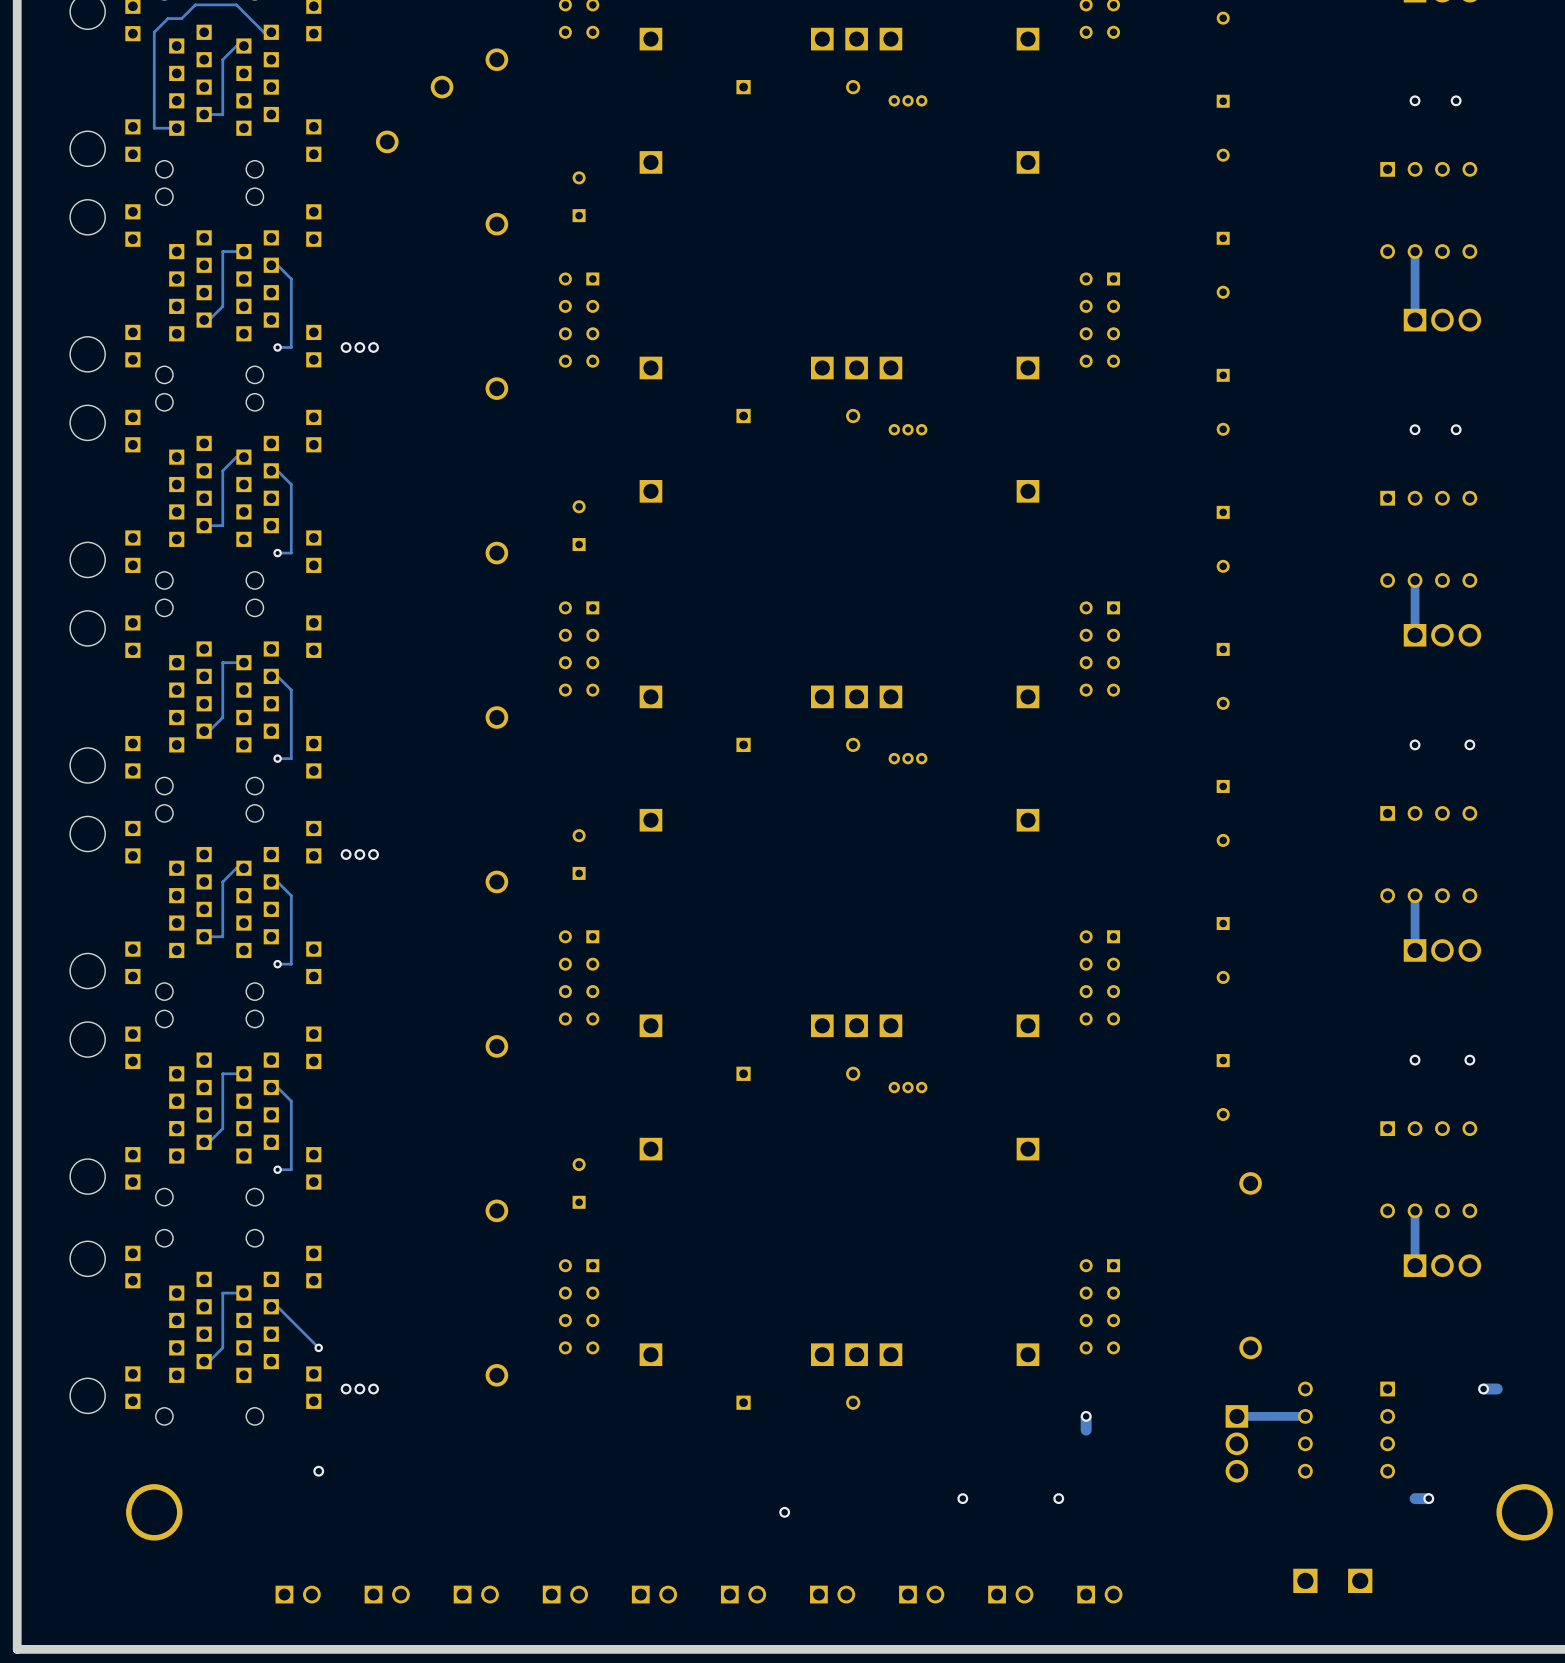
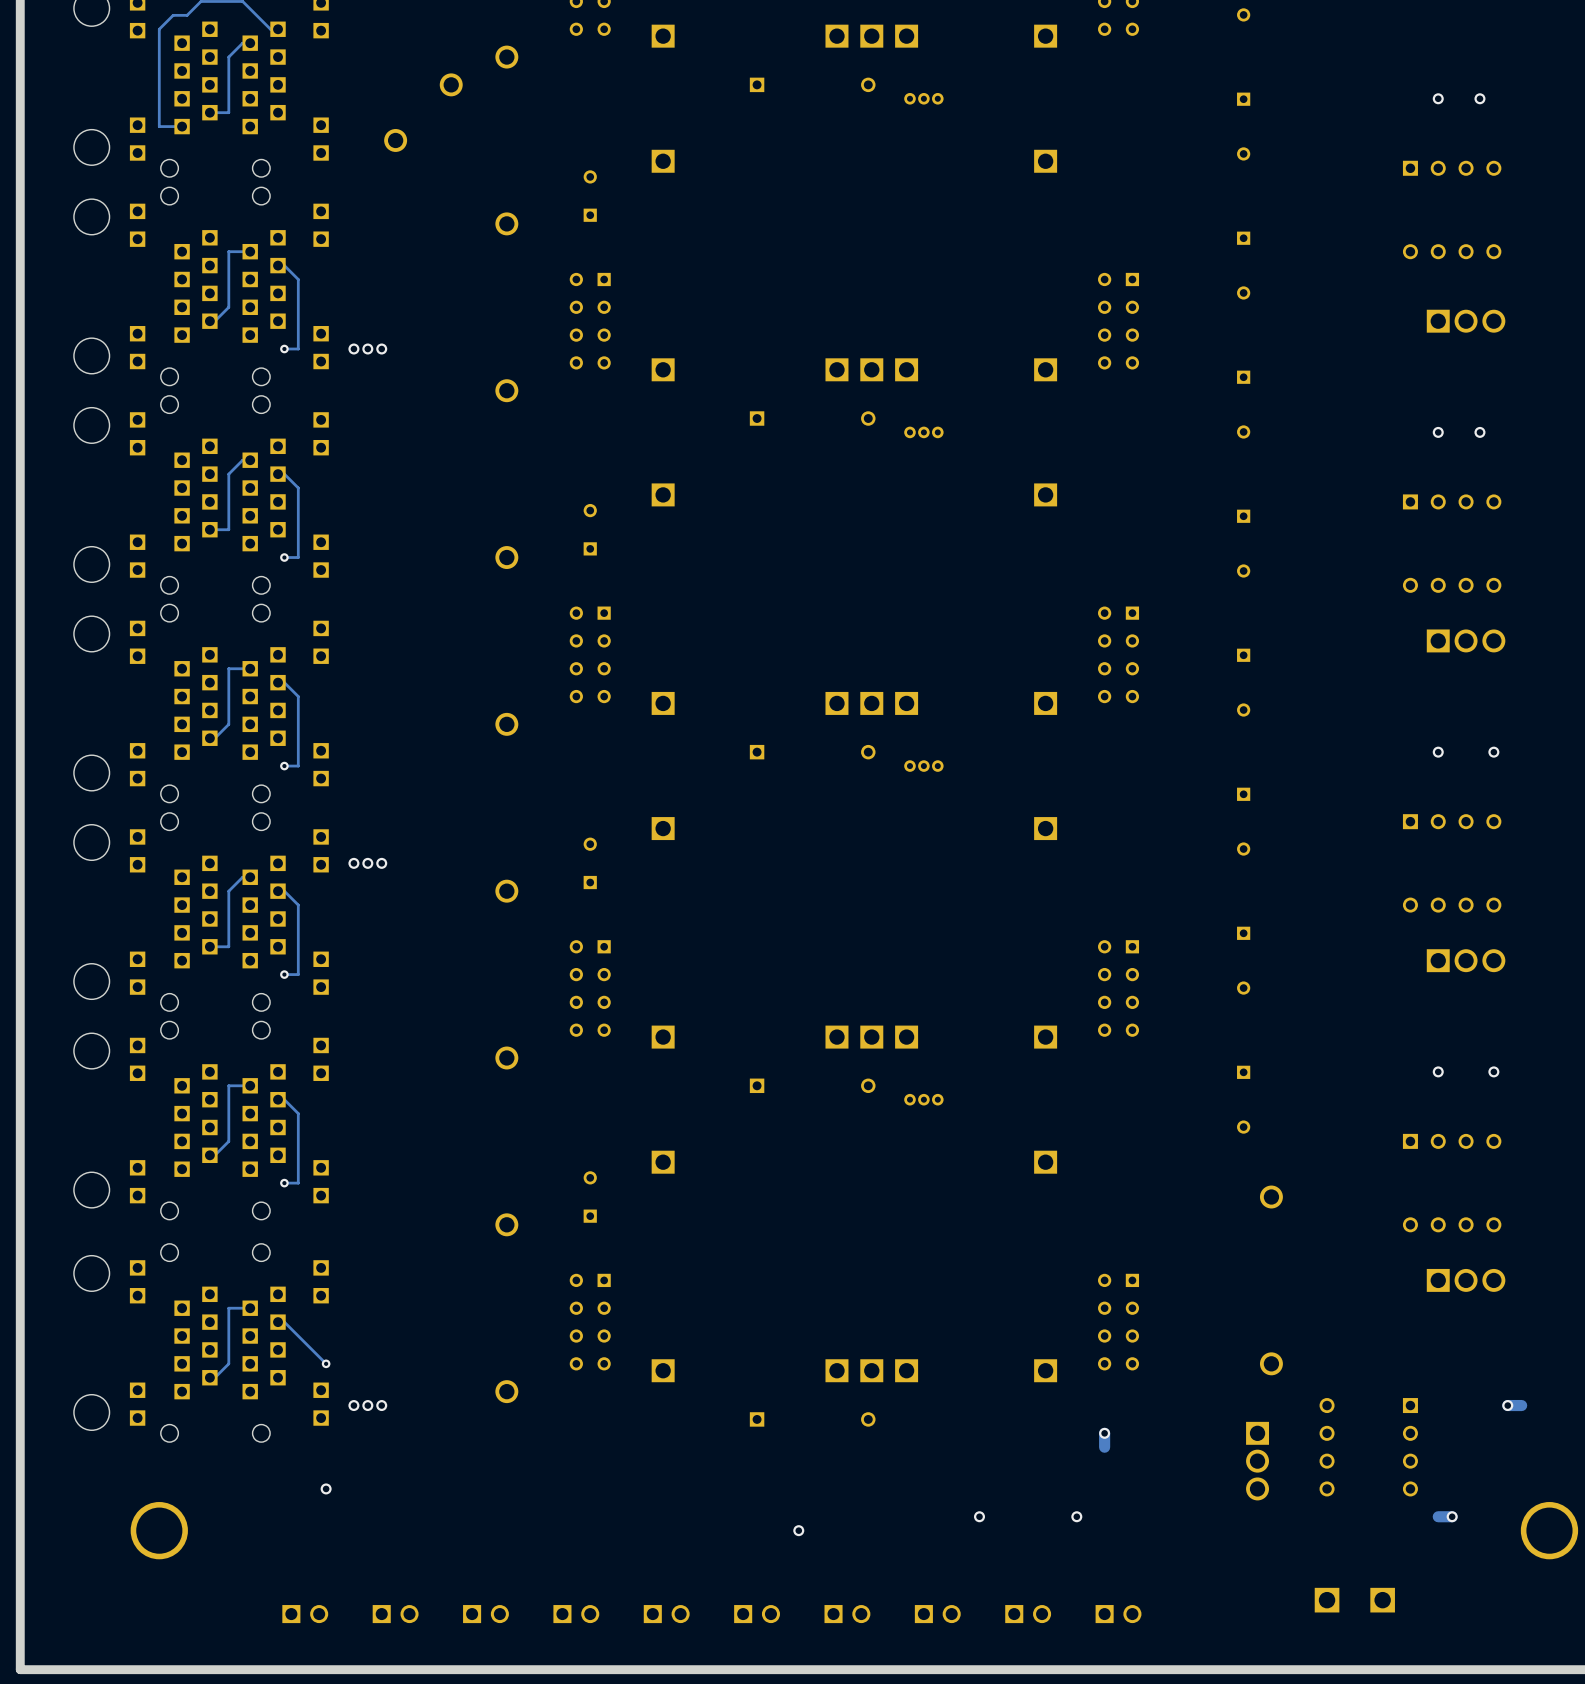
track: (1415, 251) (1415, 320) -> none
track: (1415, 580) (1415, 635) -> none
track: (1415, 895) (1415, 950) -> none
track: (1415, 1210) (1415, 1265) -> none
track: (1305, 1416) (1236, 1416) -> none

